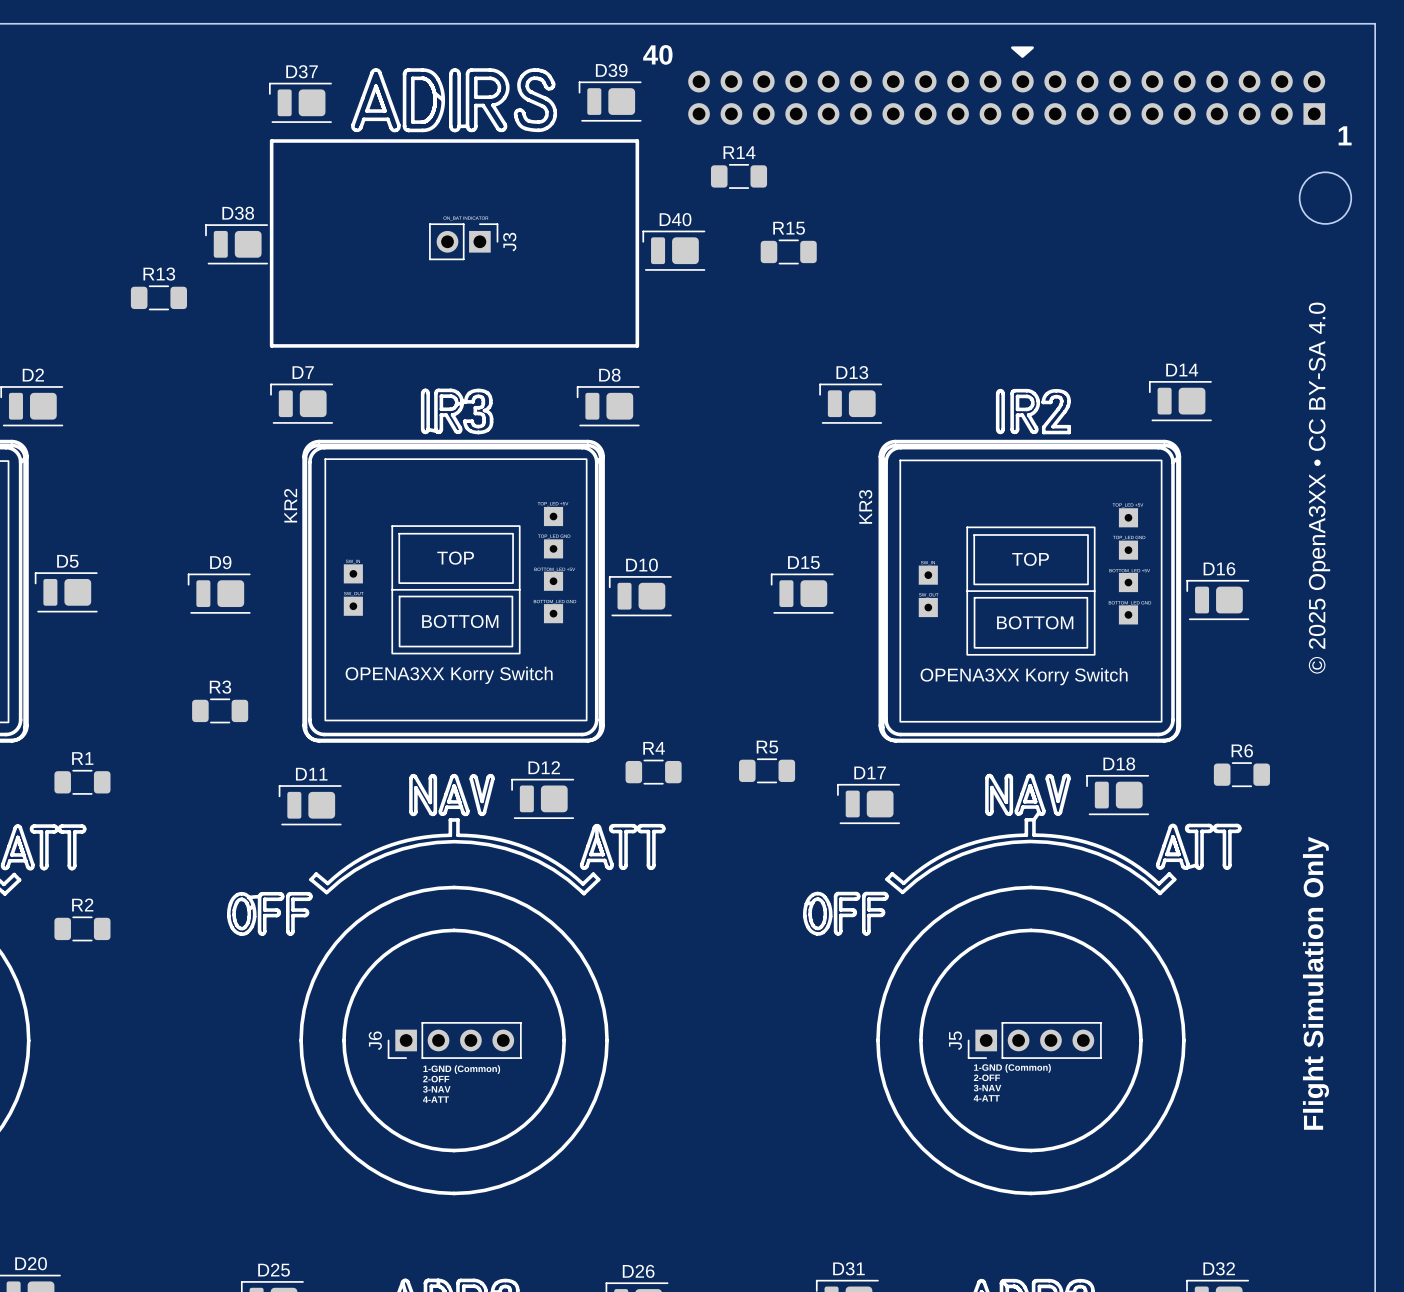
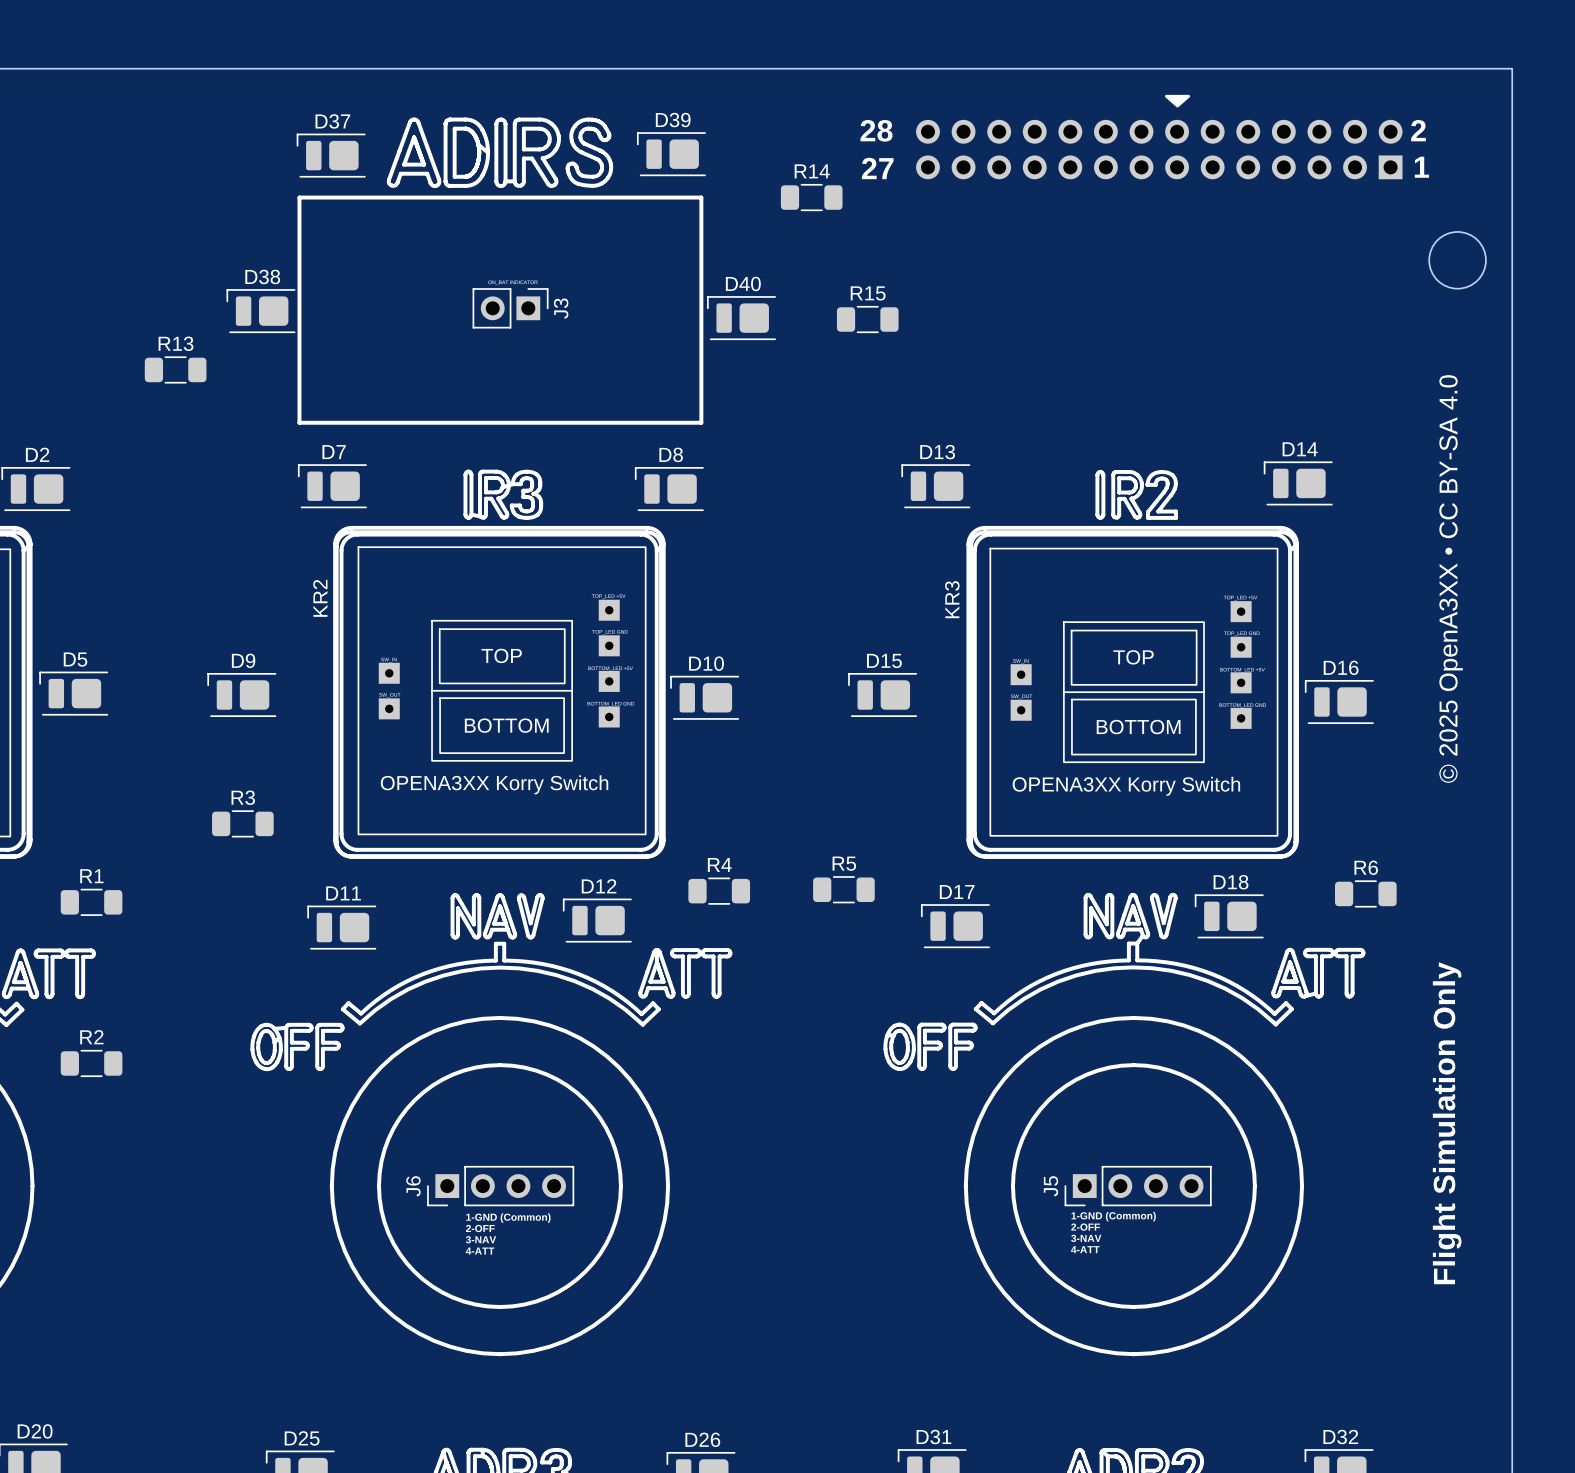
drawing position: (1022, 52) -> (1177, 101)
text: 40 (657, 54) -> none
text: none -> 28 (876, 130)
text: none -> 2 (1418, 130)
part: (1006, 97) -> none
part: none -> (1159, 149)
text: none -> 27 (877, 168)
text position: 1 (1345, 135) -> 1 (1421, 167)
R14 position: (739, 176) -> (811, 197)

